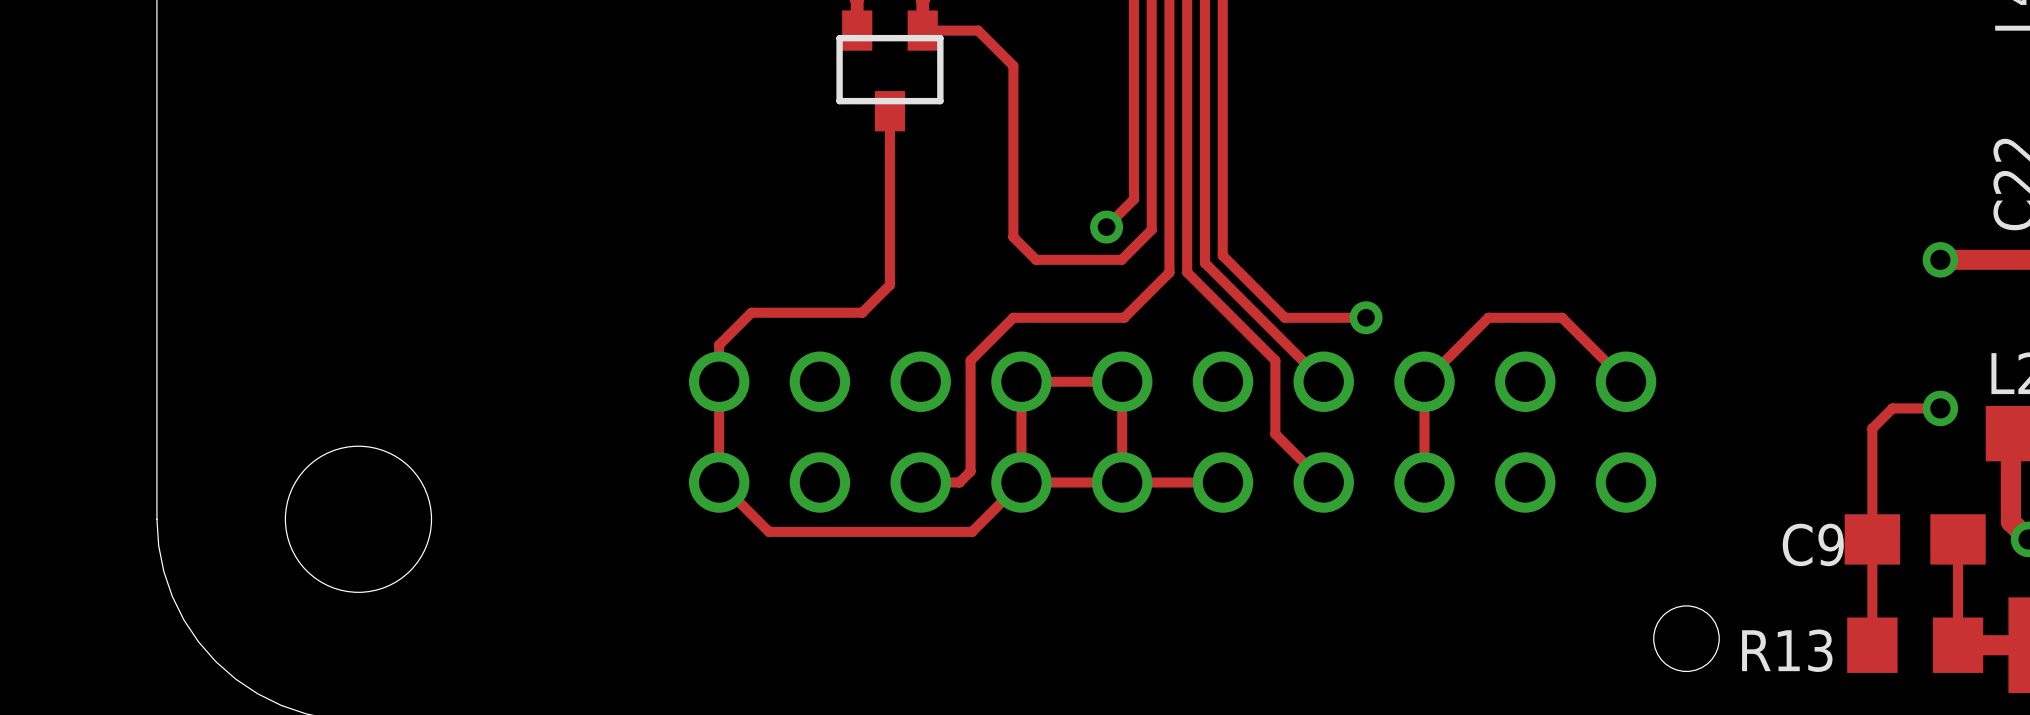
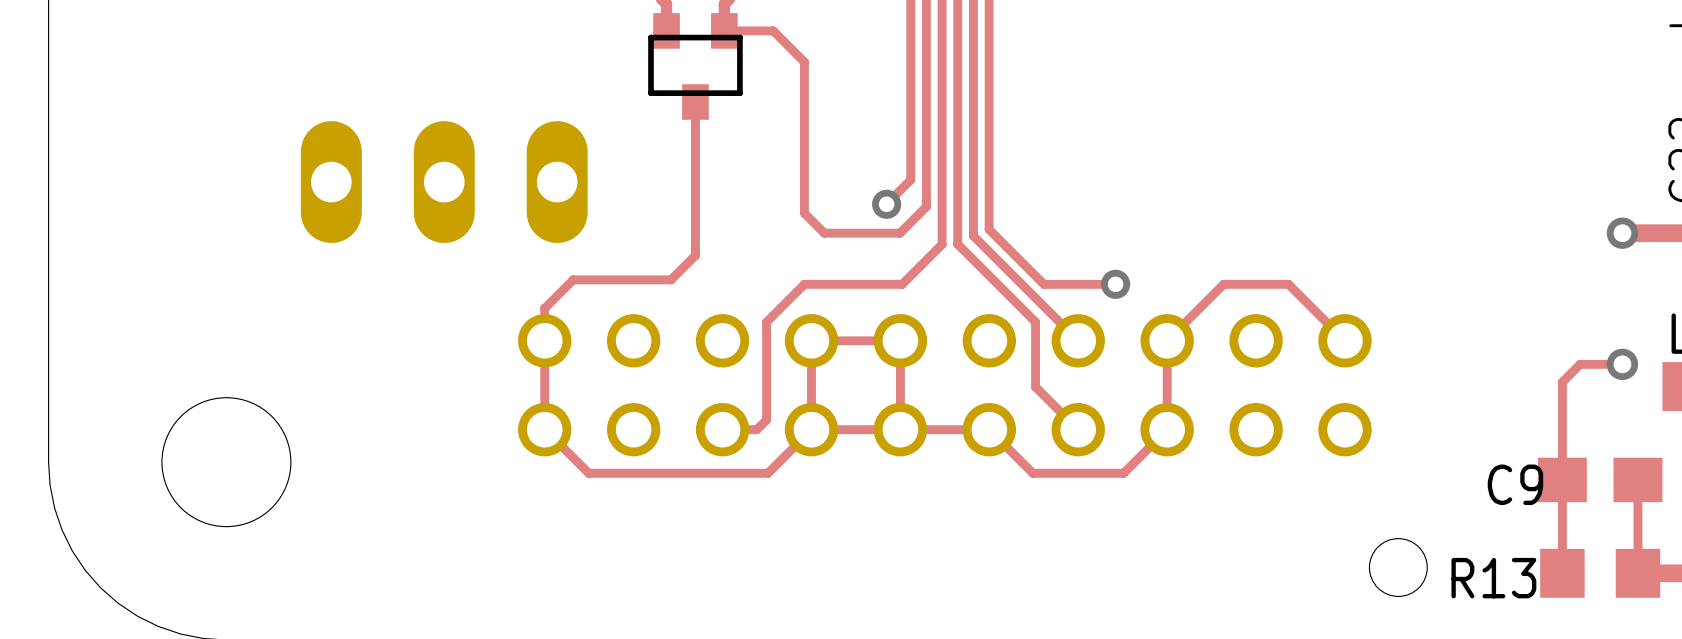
part: none -> (444, 182)
track: none -> (989, 429) (1032, 473) (1123, 473) (1167, 429)

